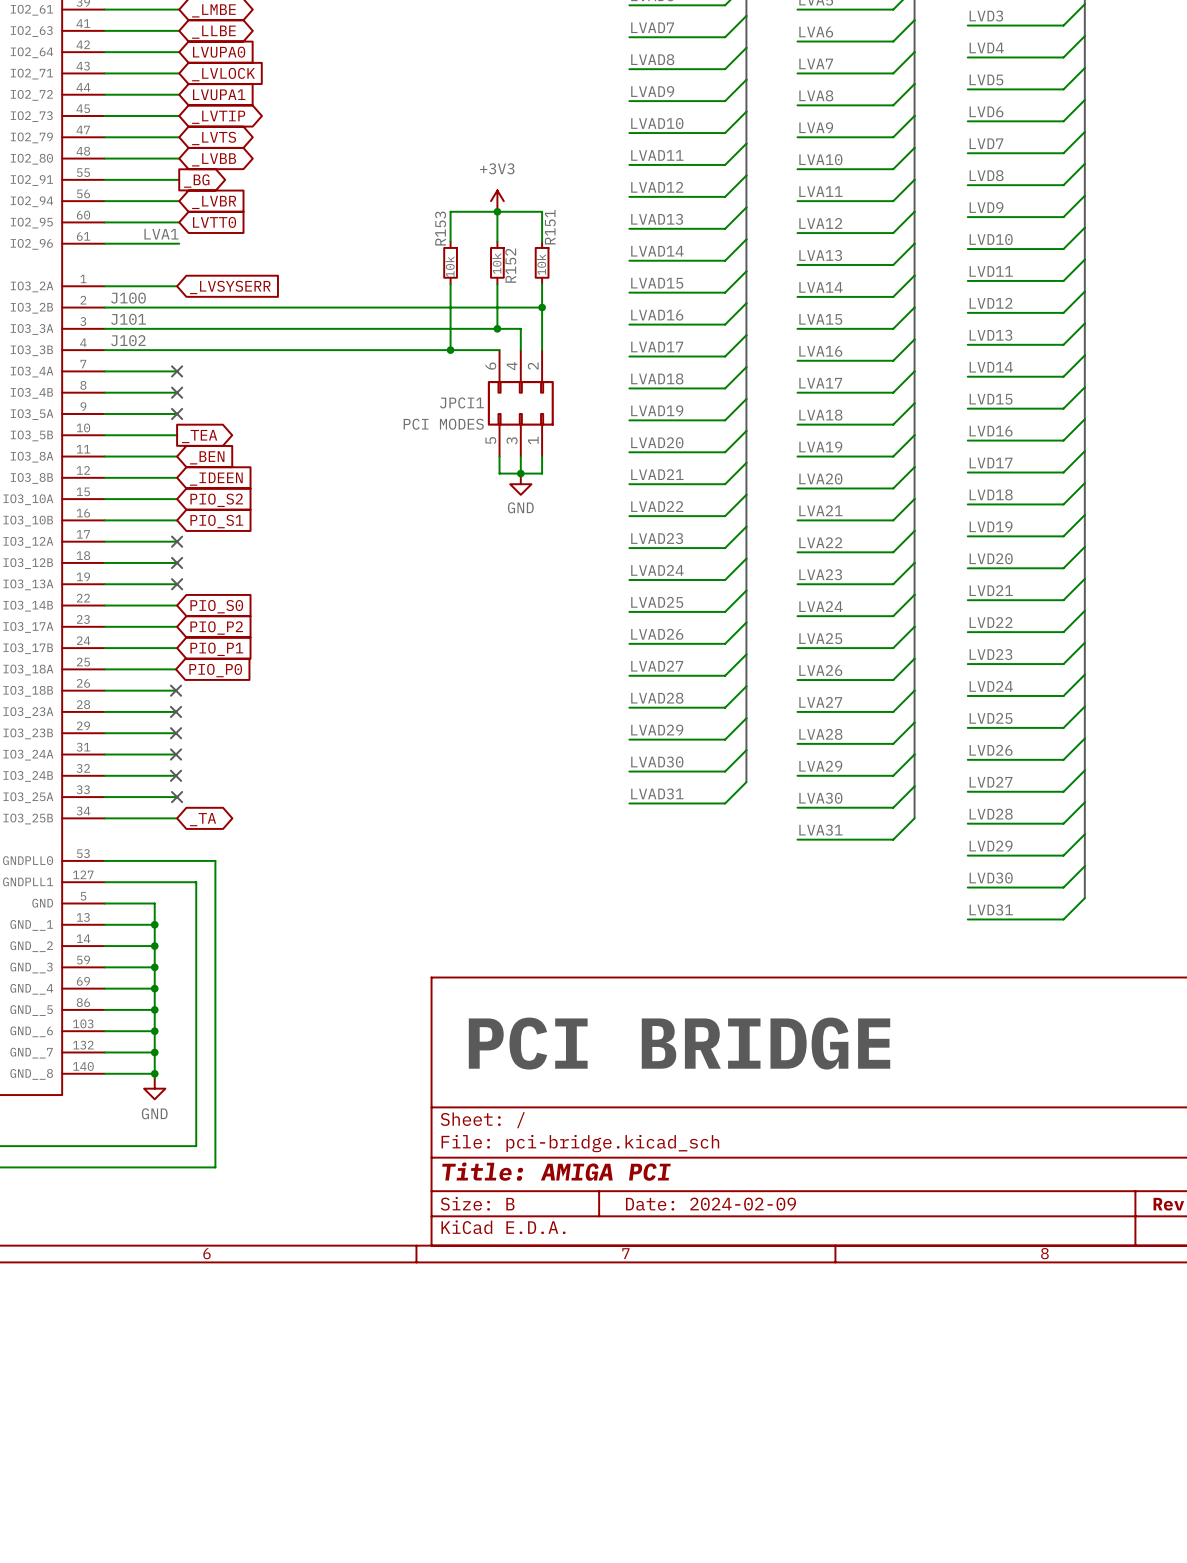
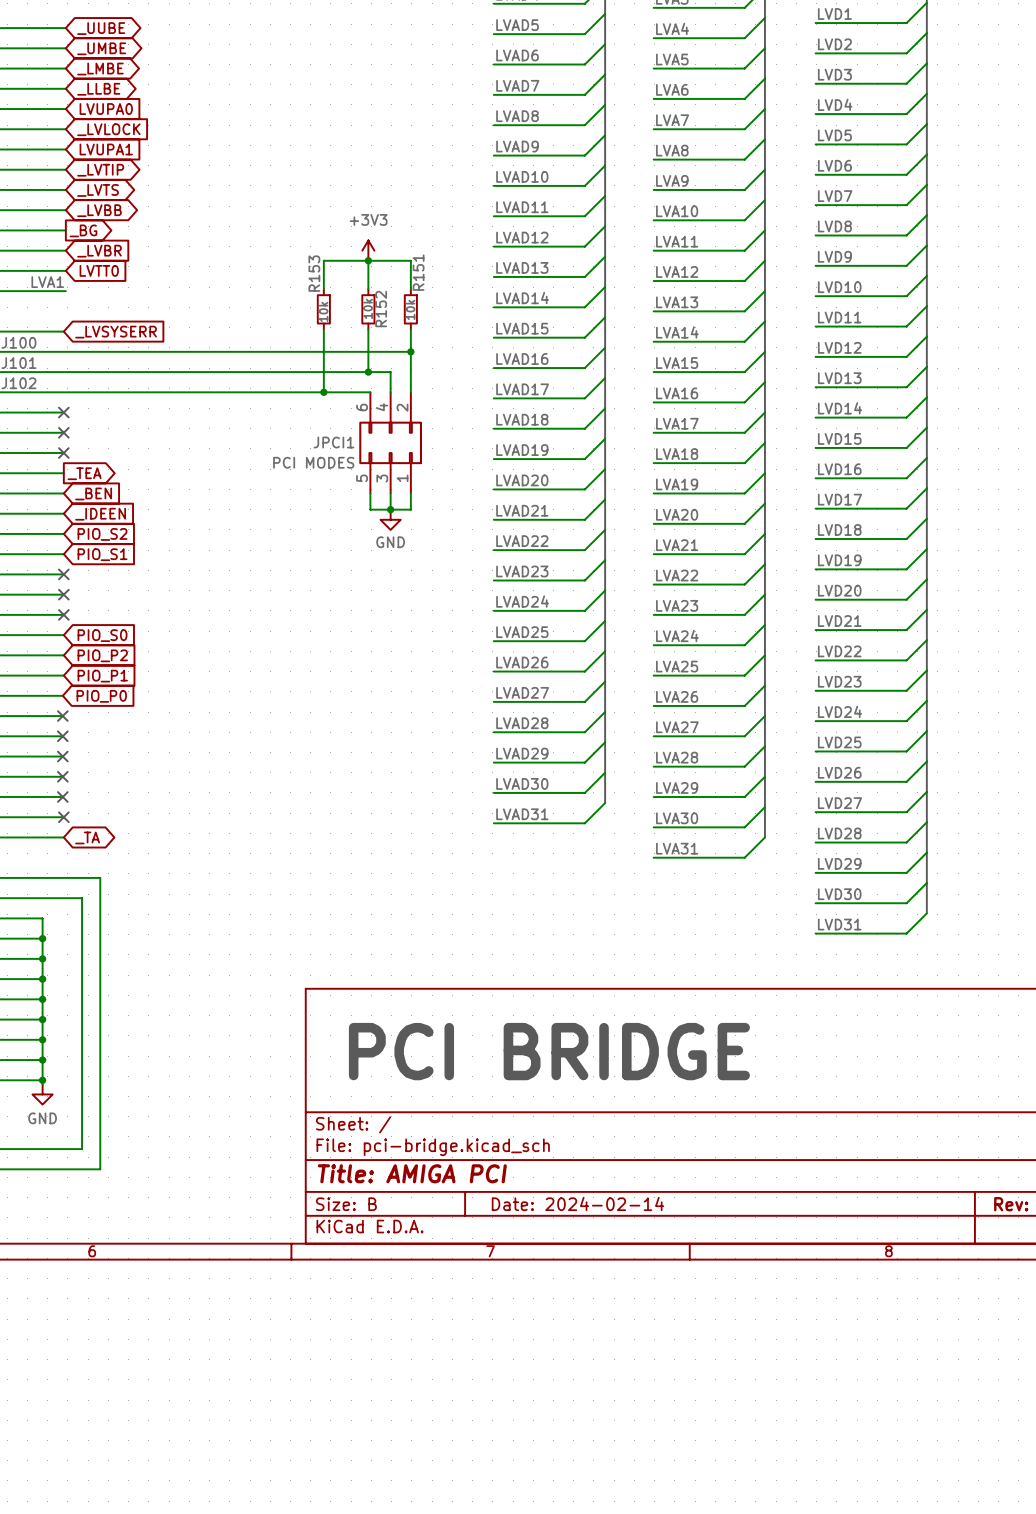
title block: Date: 2024-02-09 (710, 1204) -> Date: 2024-02-14 (577, 1203)

